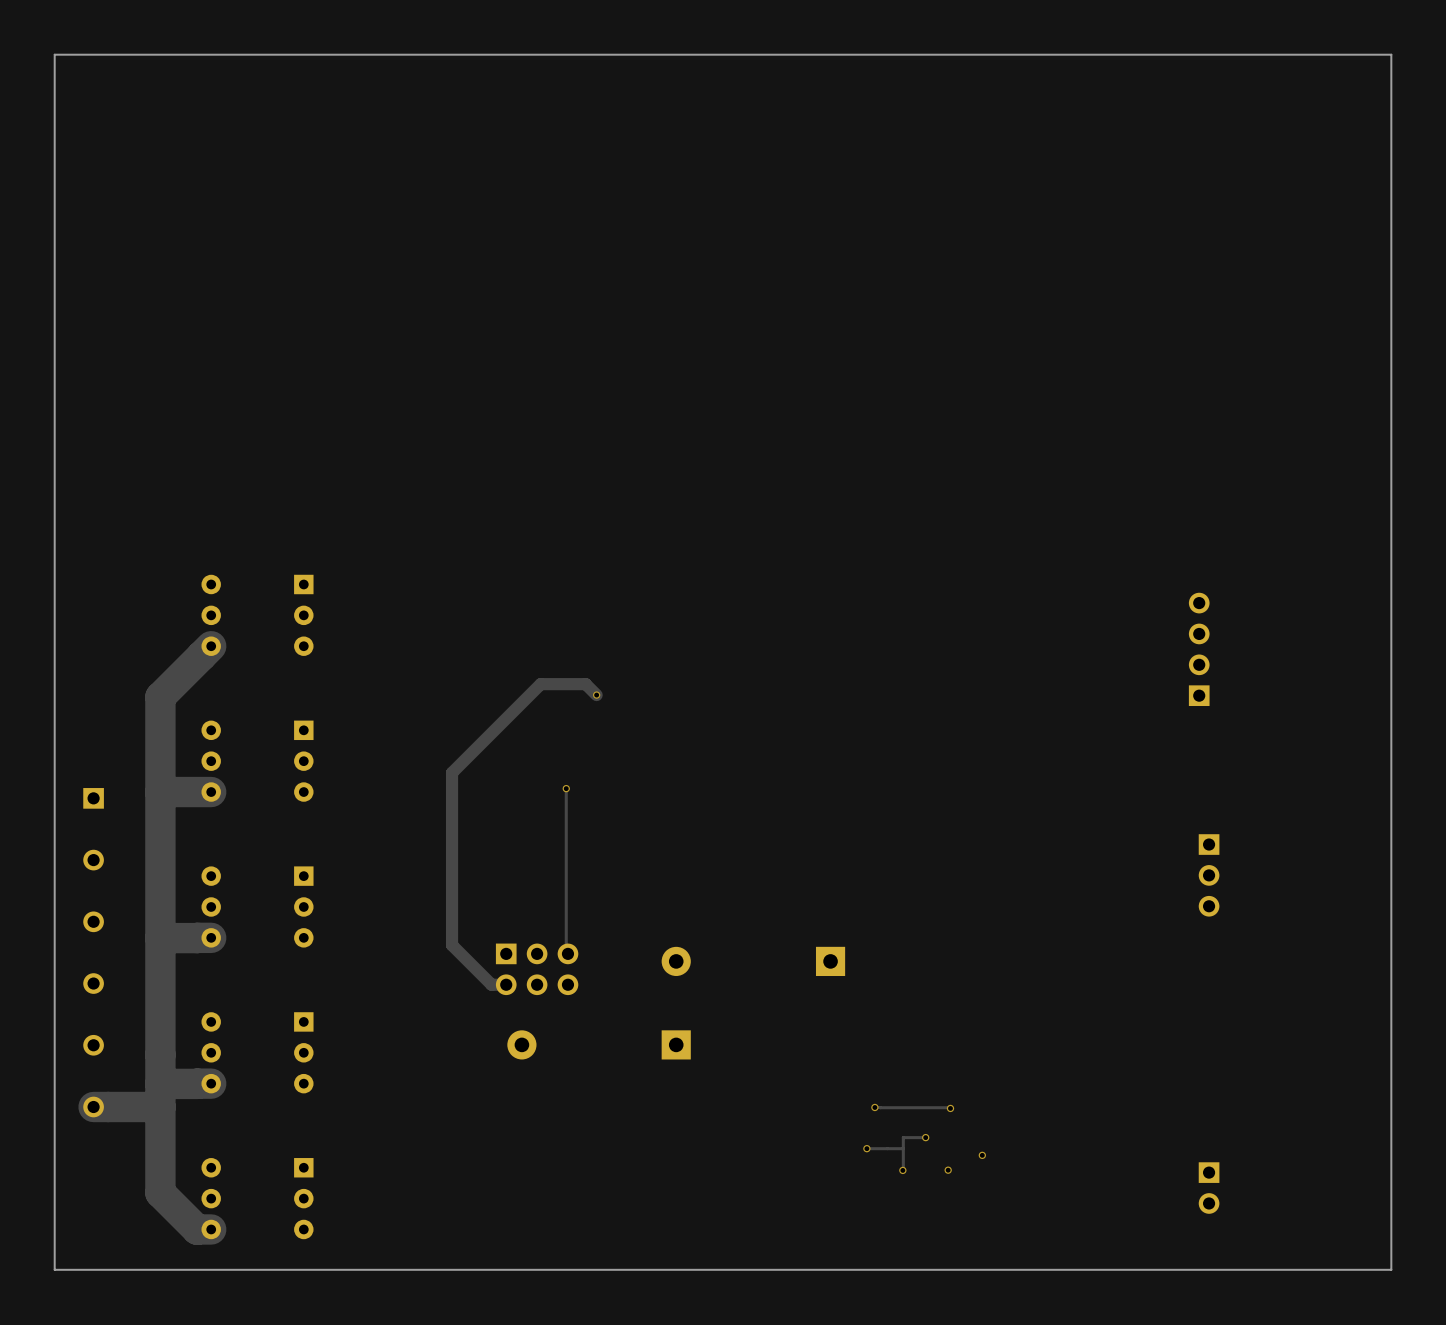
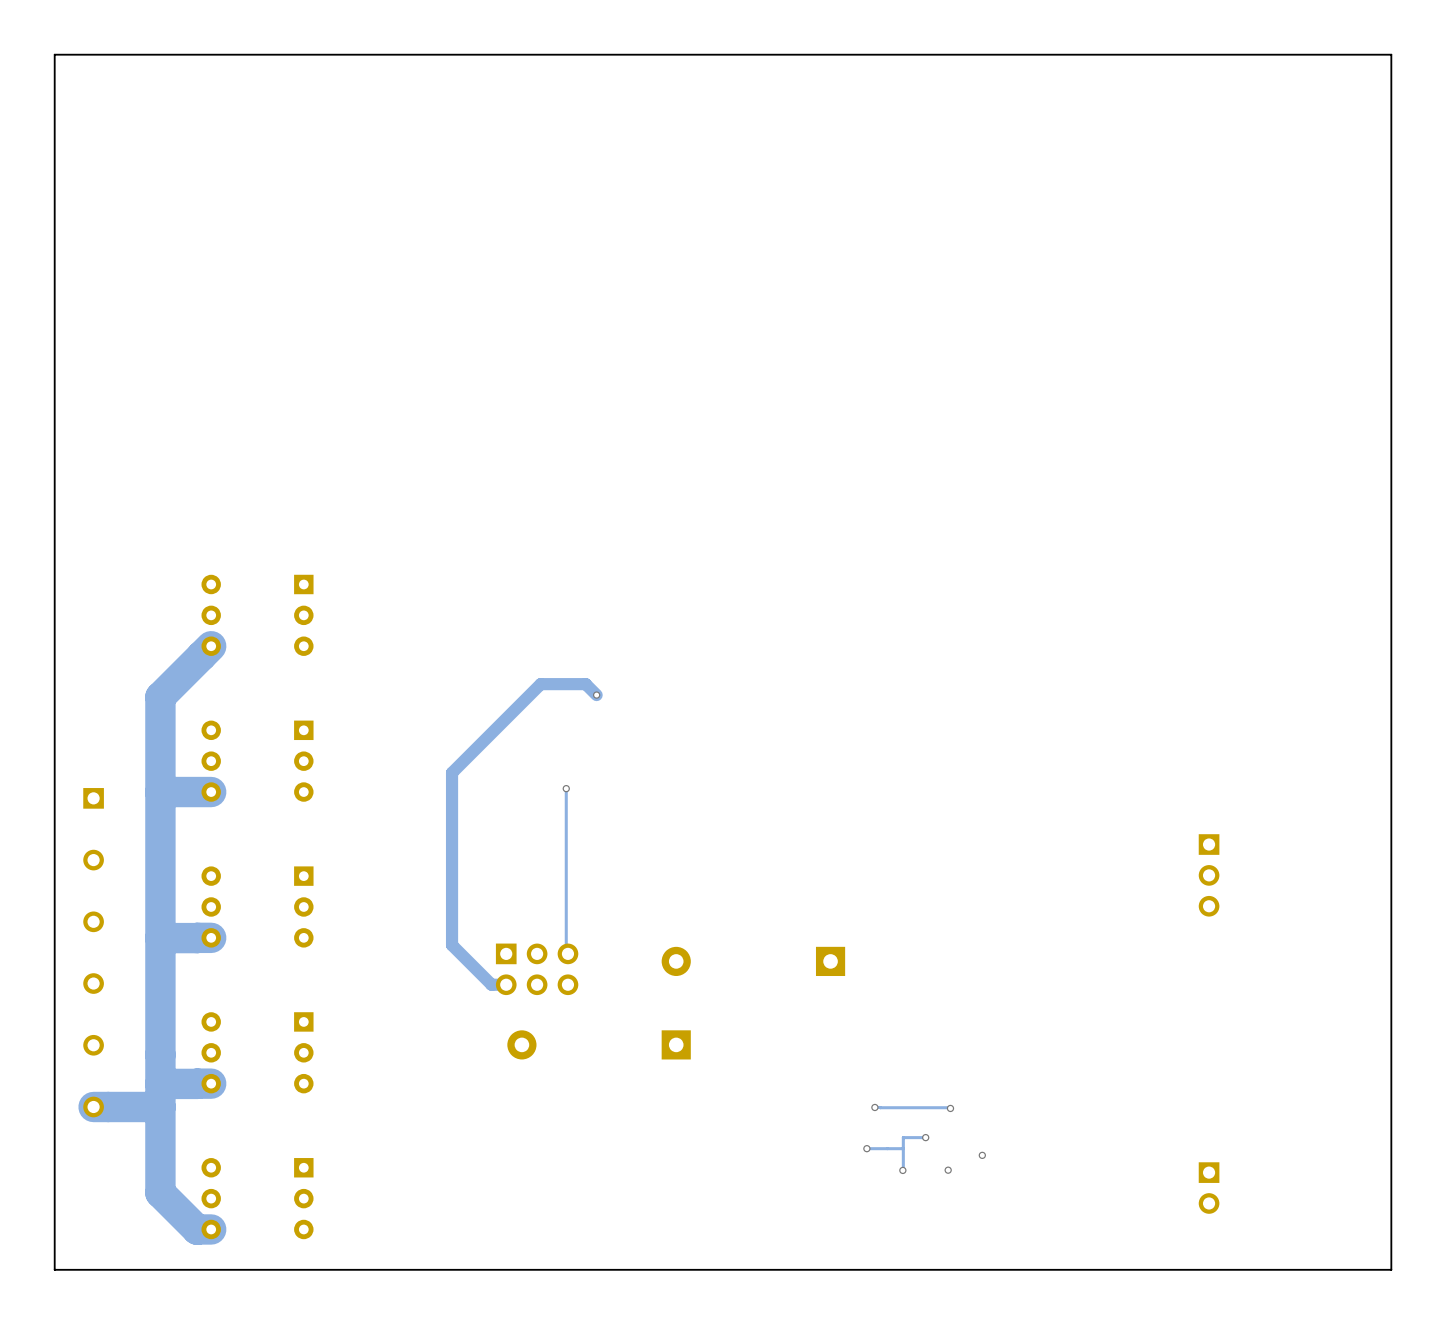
part: (1199, 649) -> none

